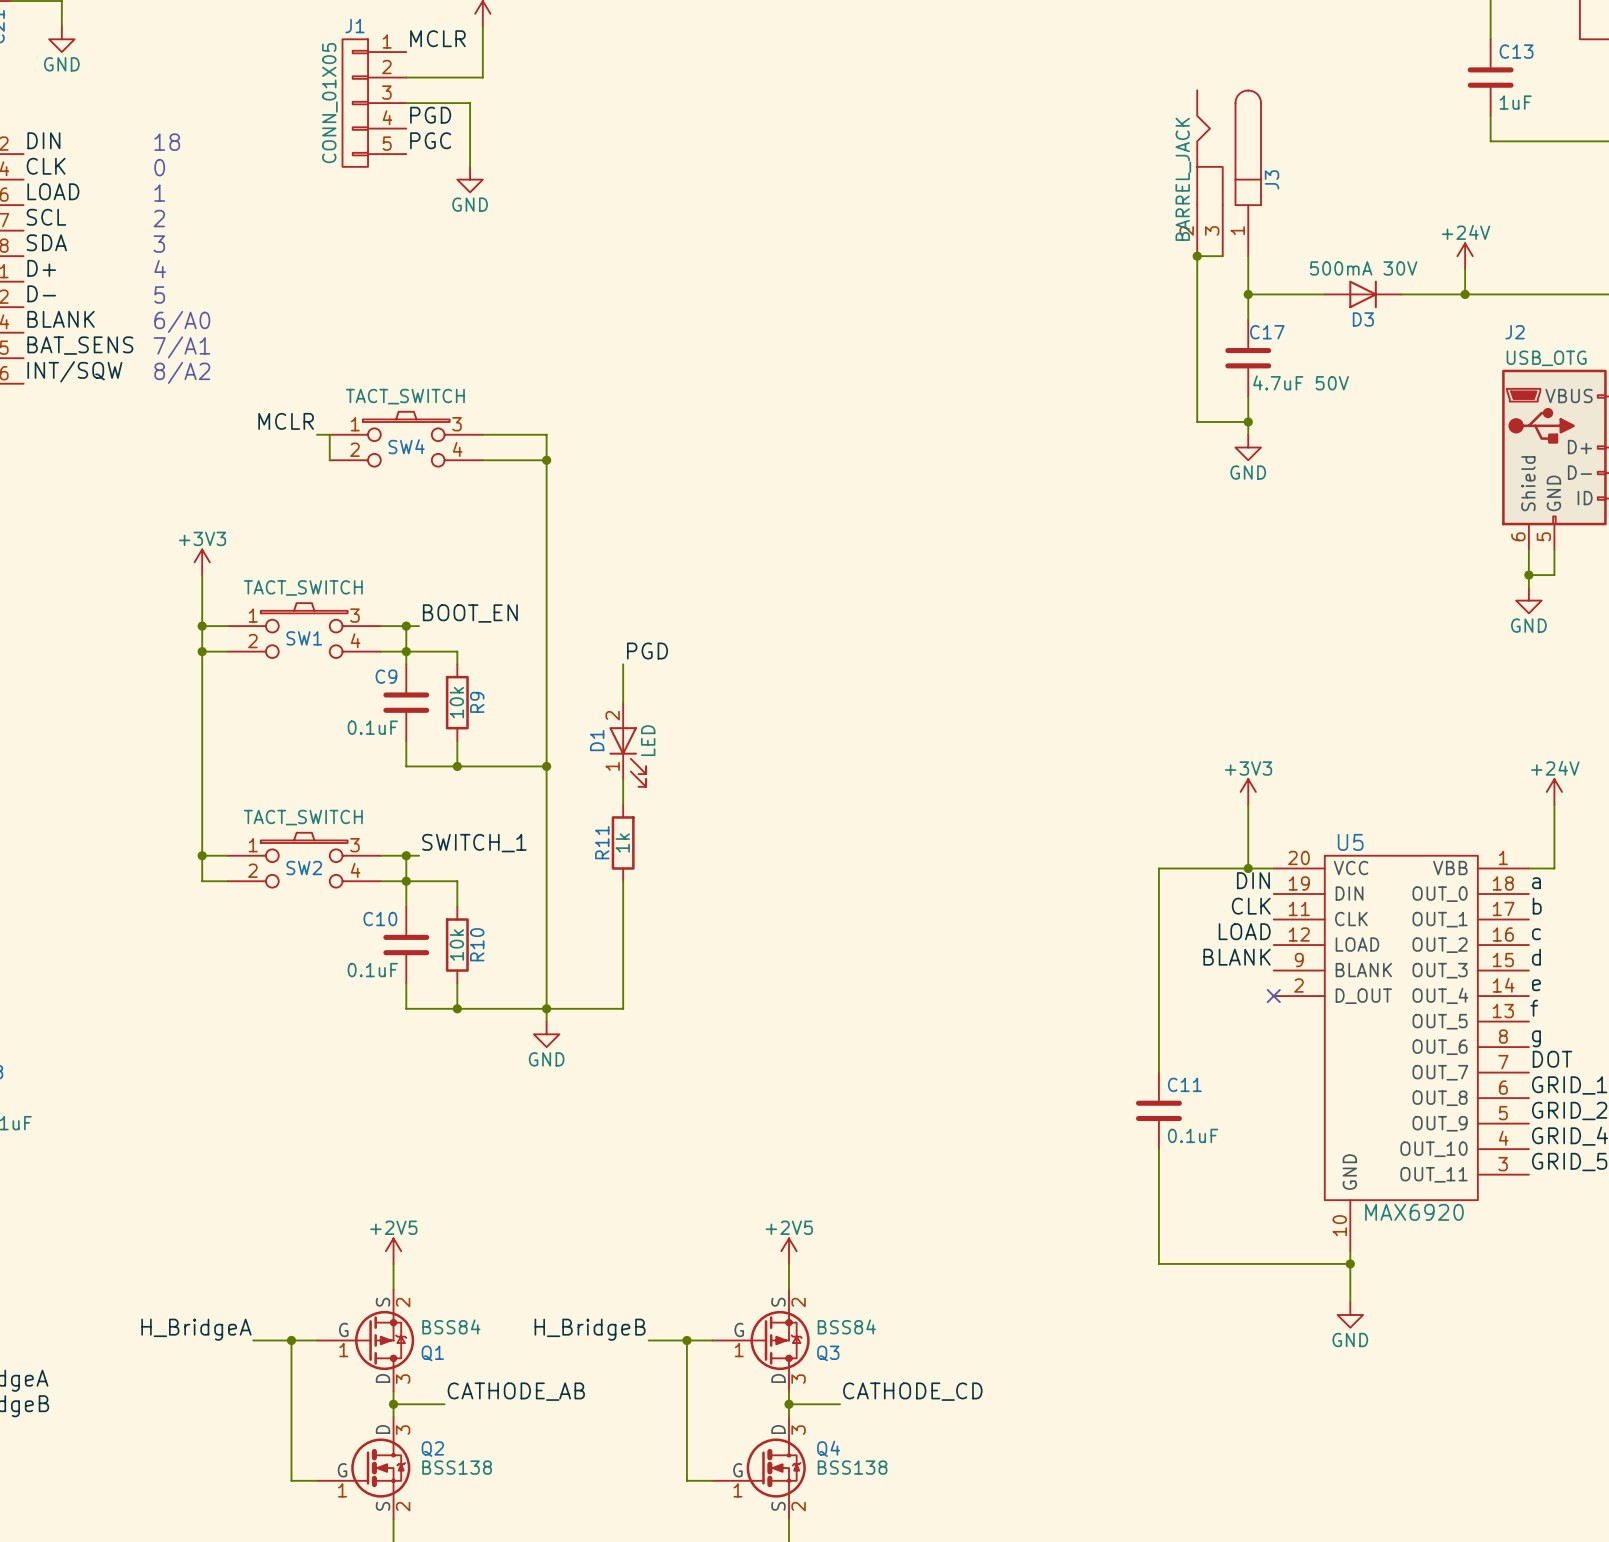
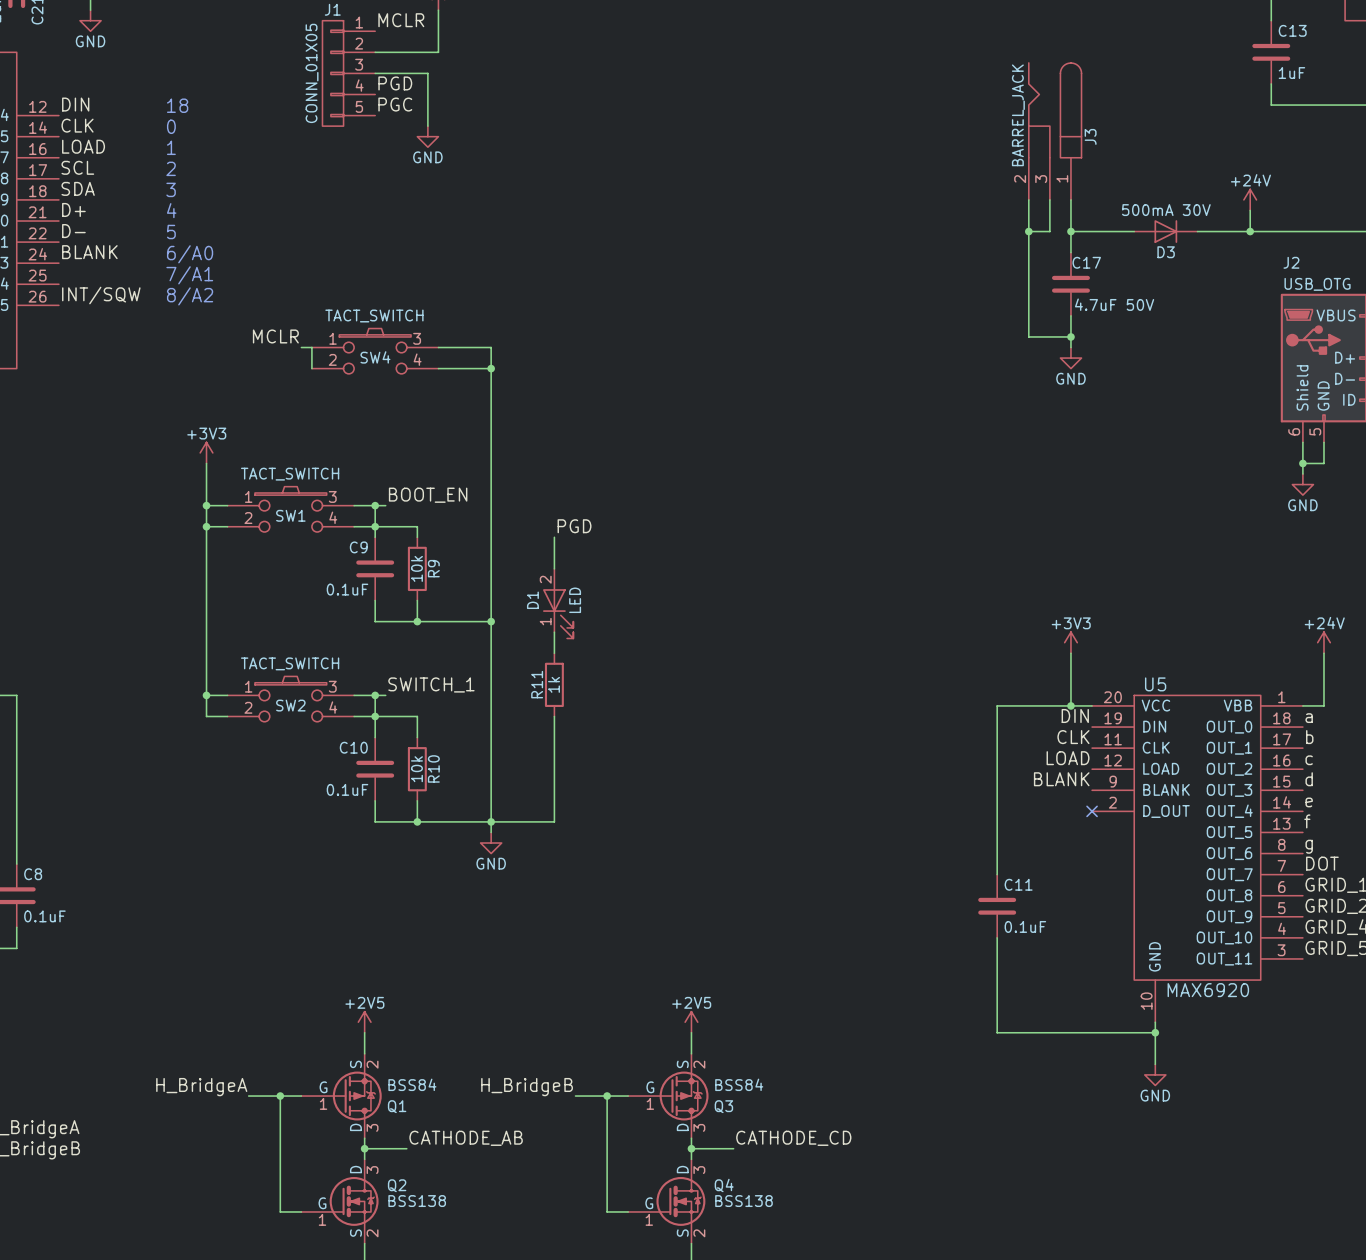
J3 value position: BARREL_JACK (1183, 179) -> BARREL_JACK (1018, 115)
wire: (1197, 256) (1222, 256) -> (1028, 231) (1049, 231) (1049, 199)
junction position: (1197, 256) -> (1028, 231)
label: BAT_SENS (80, 345) -> none

